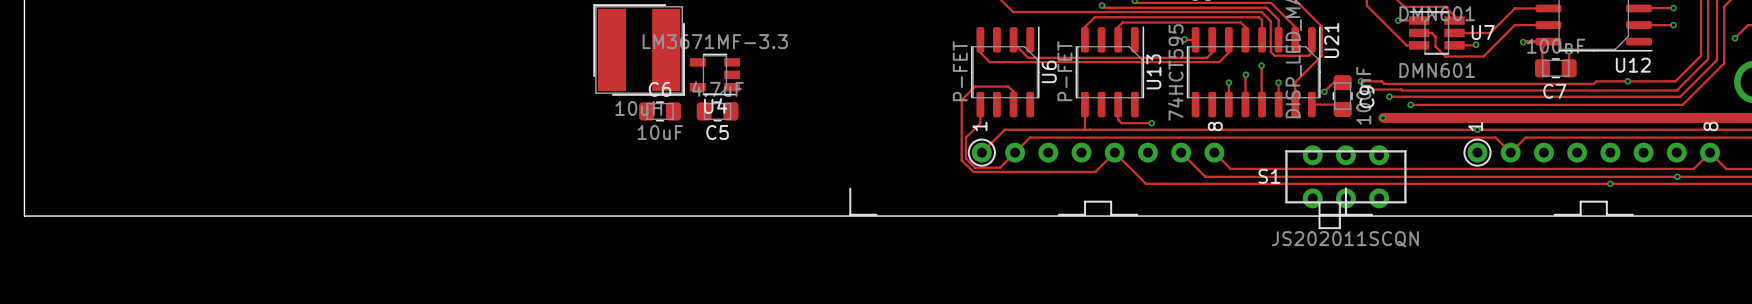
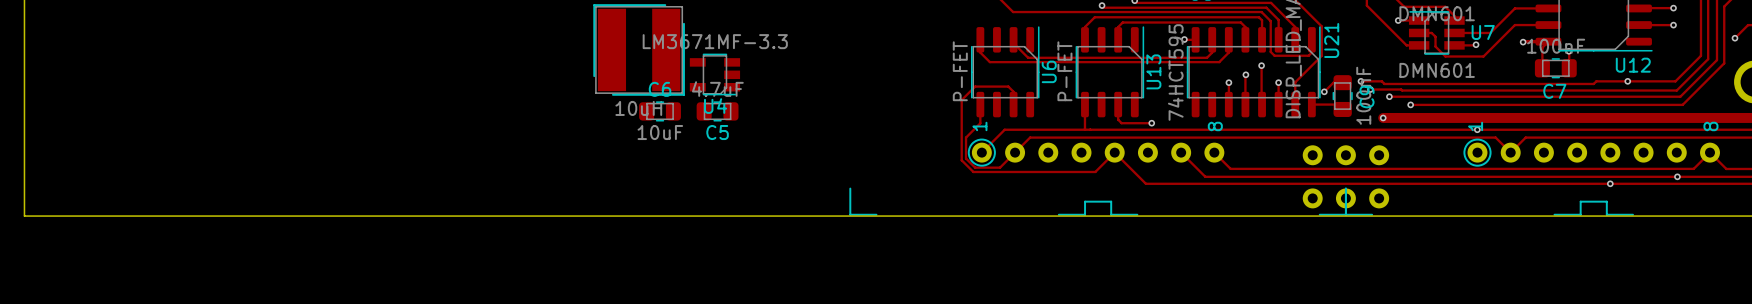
S1 side: top (1345, 187) -> bottom (1345, 176)

